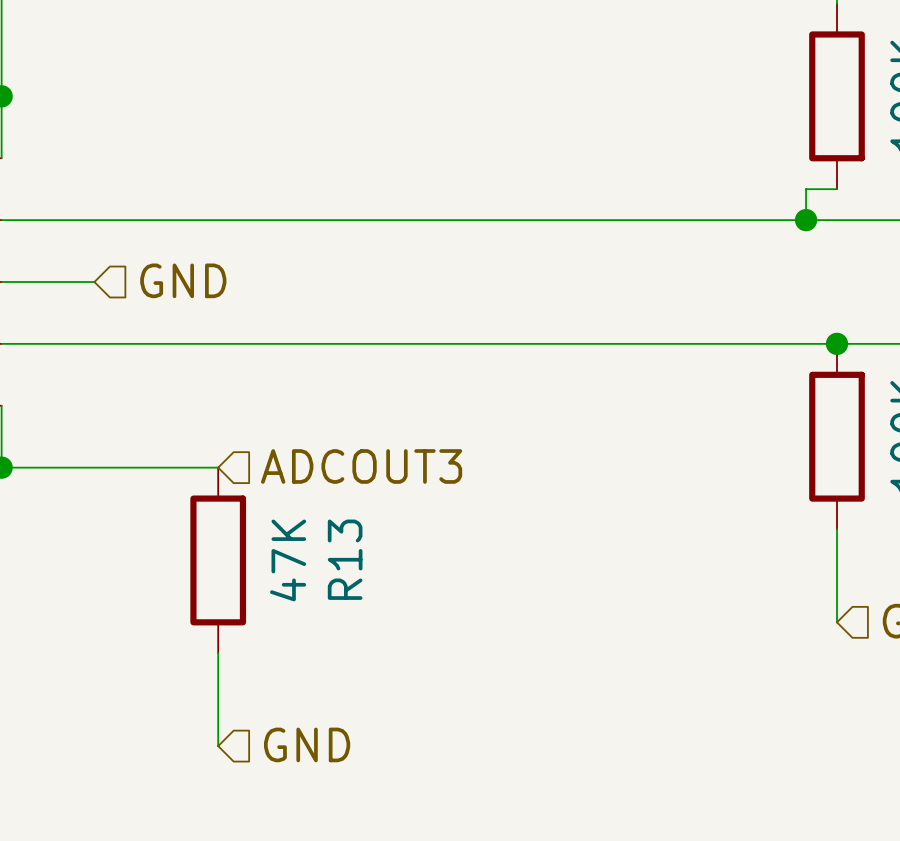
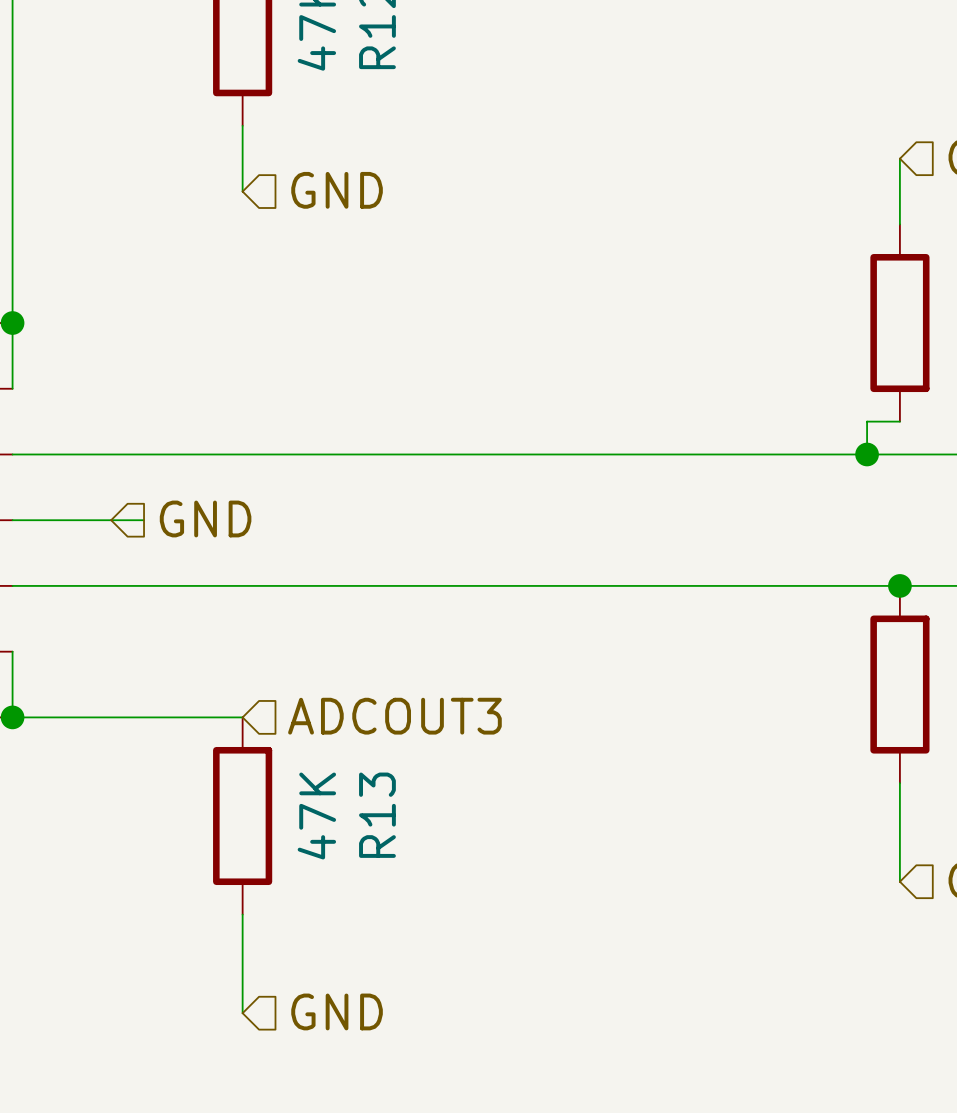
wire: none -> (111, 520) (144, 520)

